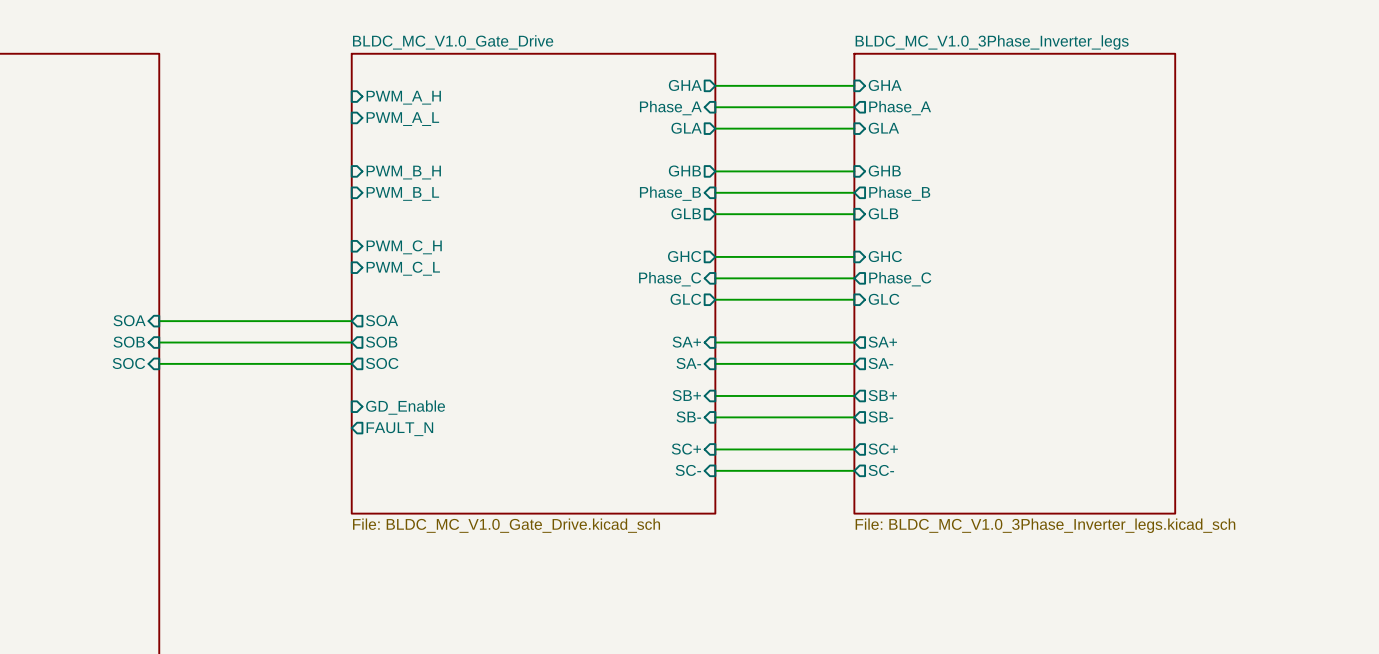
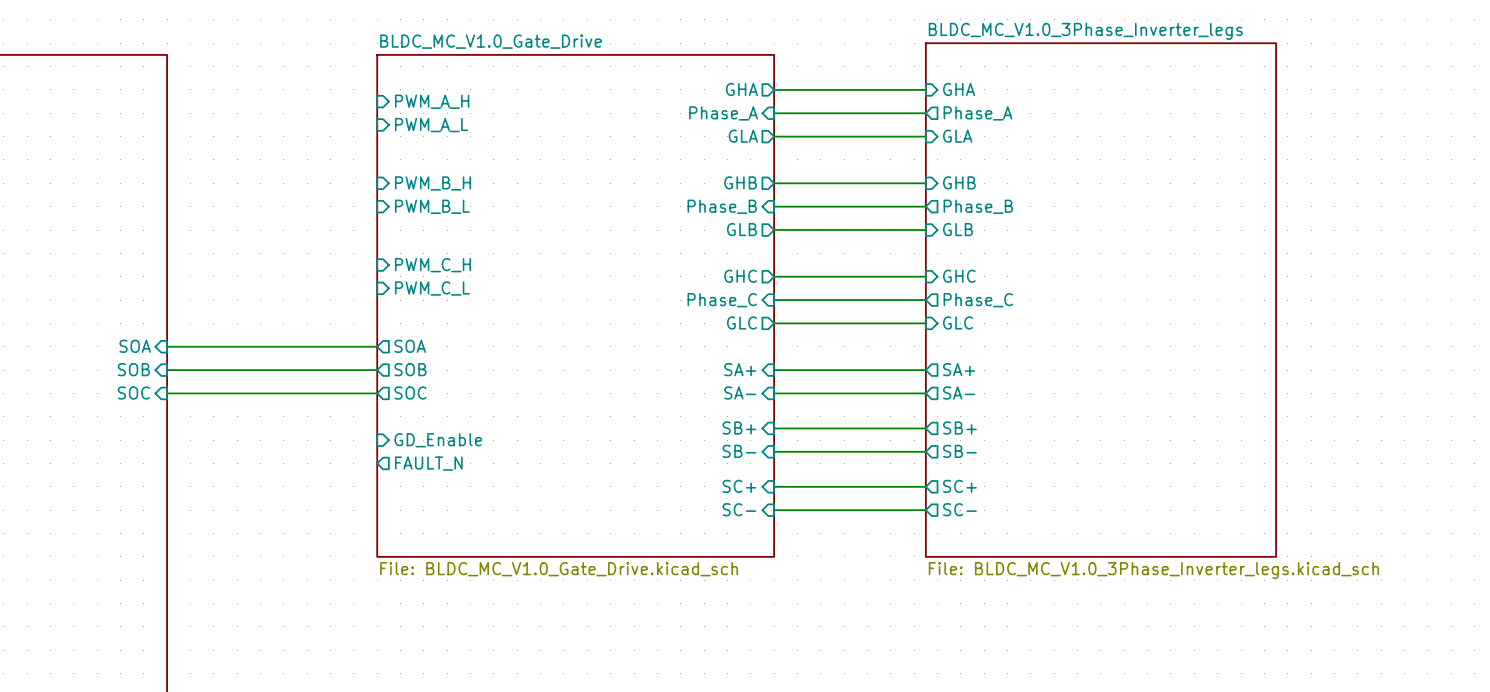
sheet BLDC_MC_V1.0_3Phase_Inverter_legs shape: [853, 53, 1176, 515] -> [925, 42, 1277, 558]

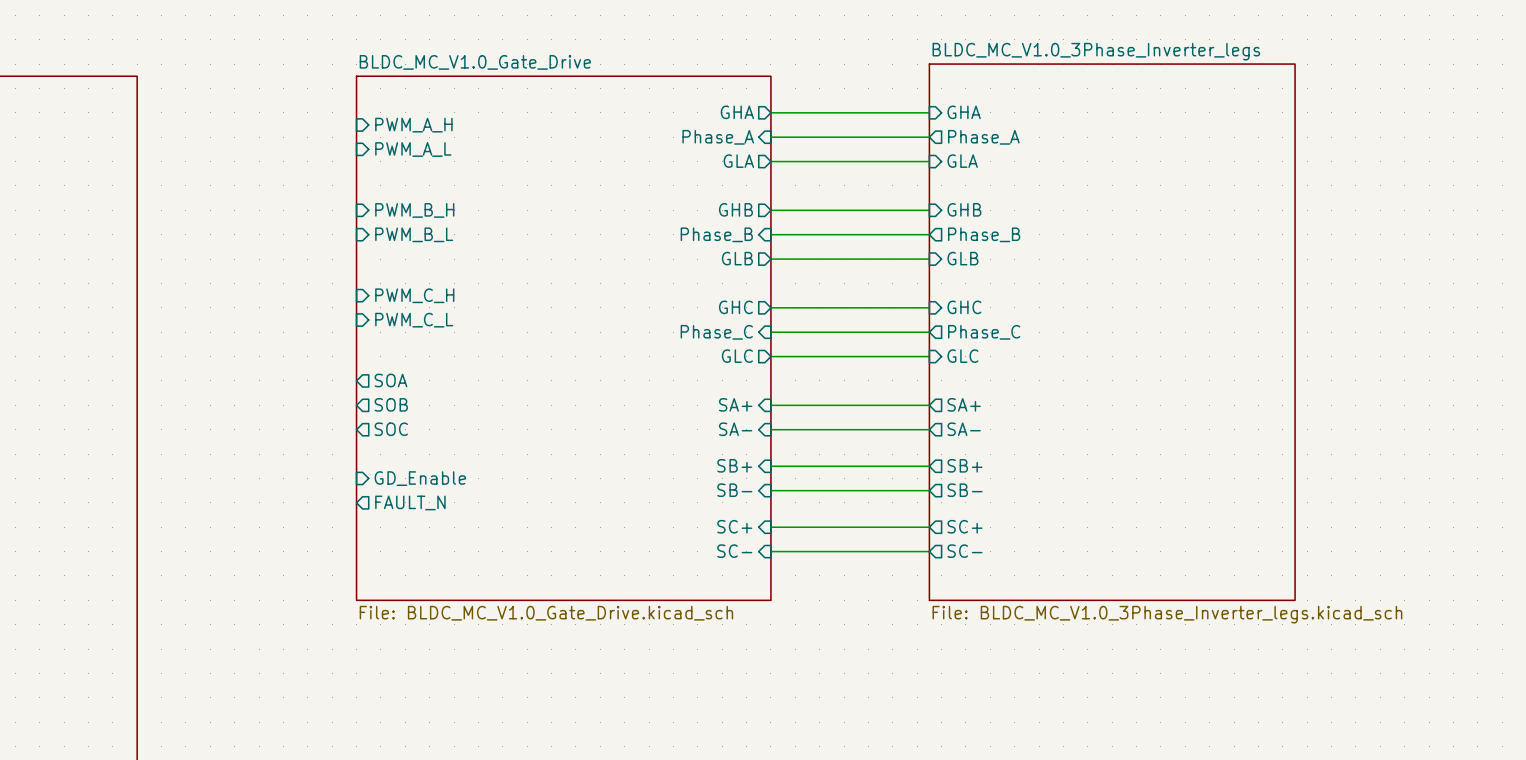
sheet pin: SOA (135, 346) -> none
wire: (167, 346) (377, 346) -> none
sheet pin: SOB (133, 369) -> none
wire: (167, 370) (377, 370) -> none
sheet pin: SOC (133, 393) -> none
wire: (167, 393) (377, 393) -> none

